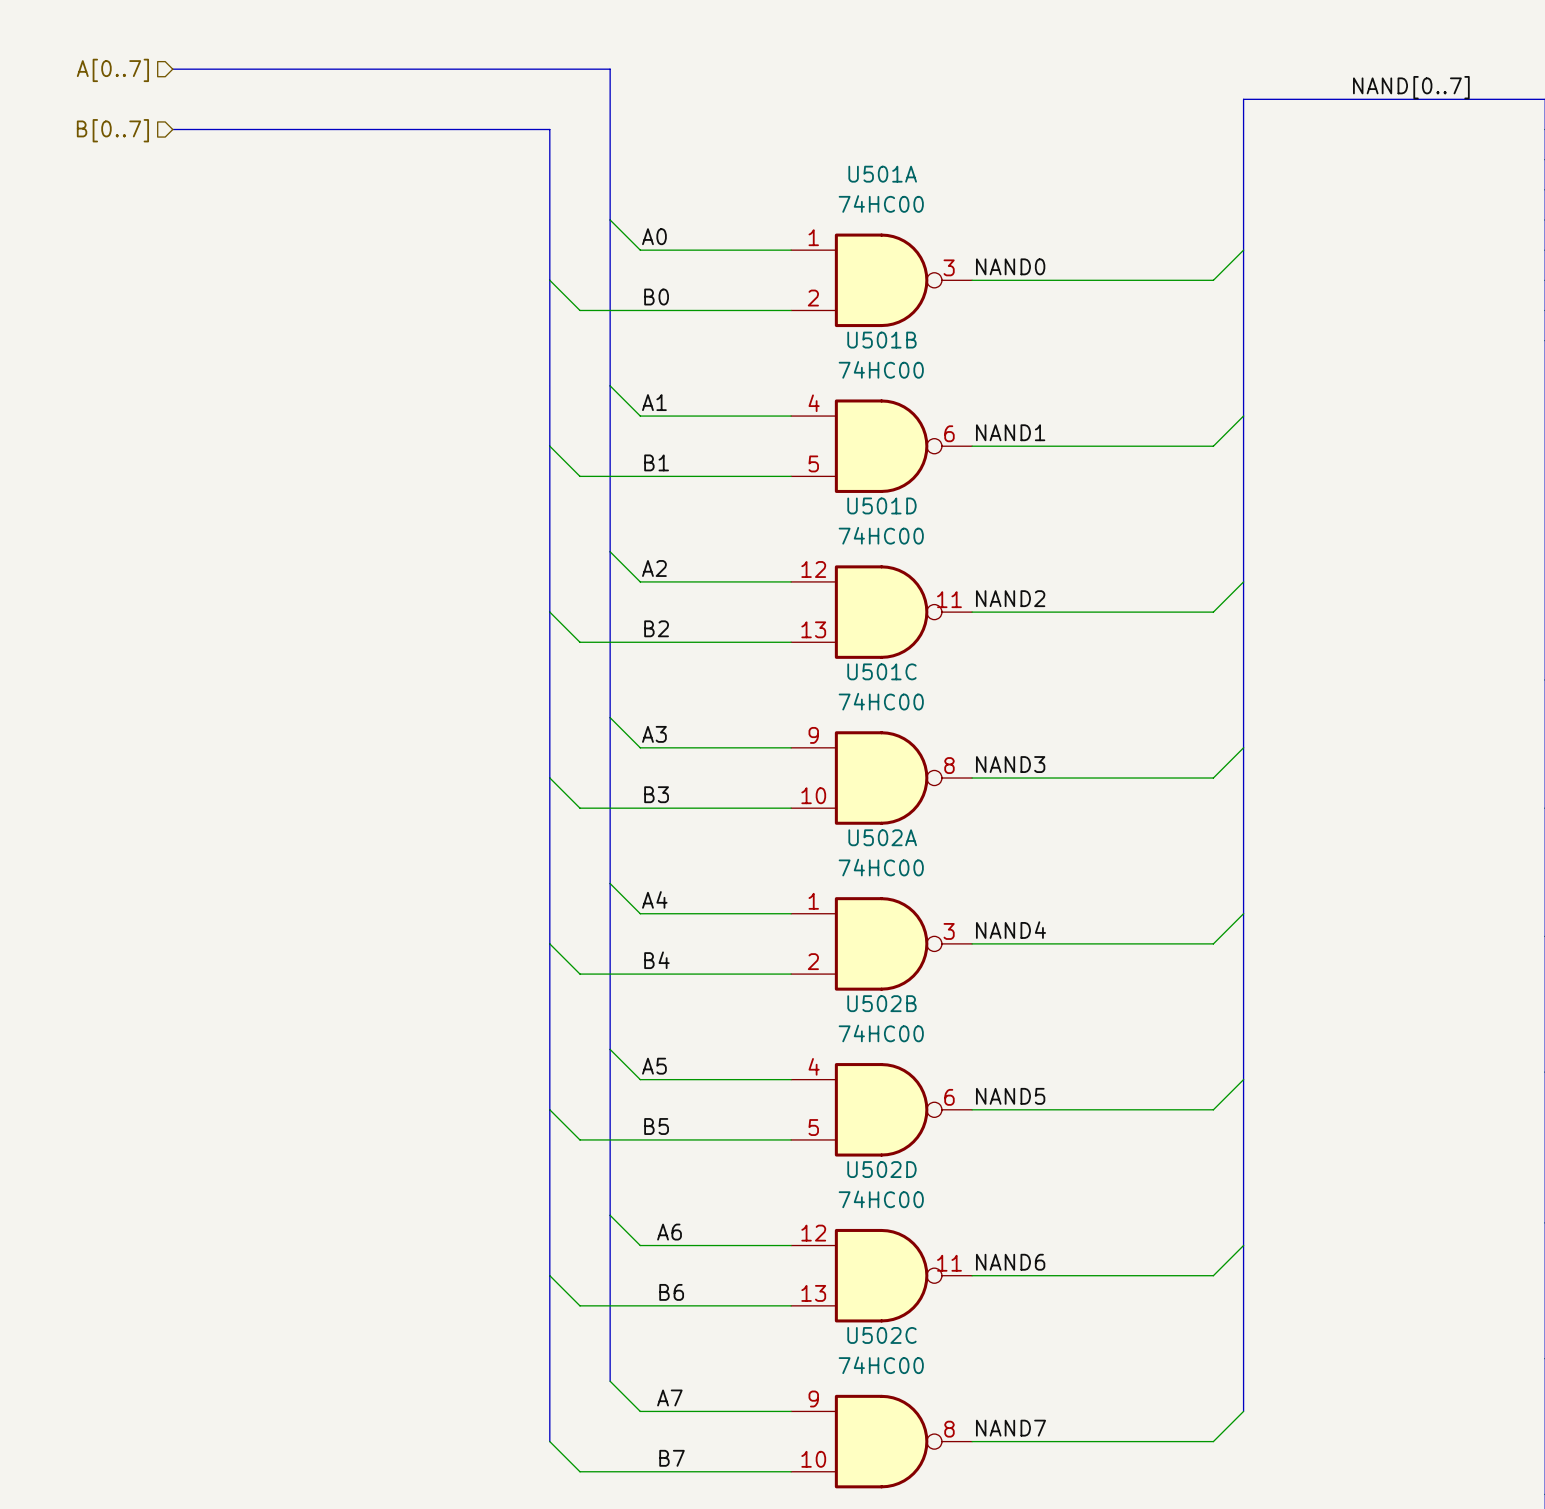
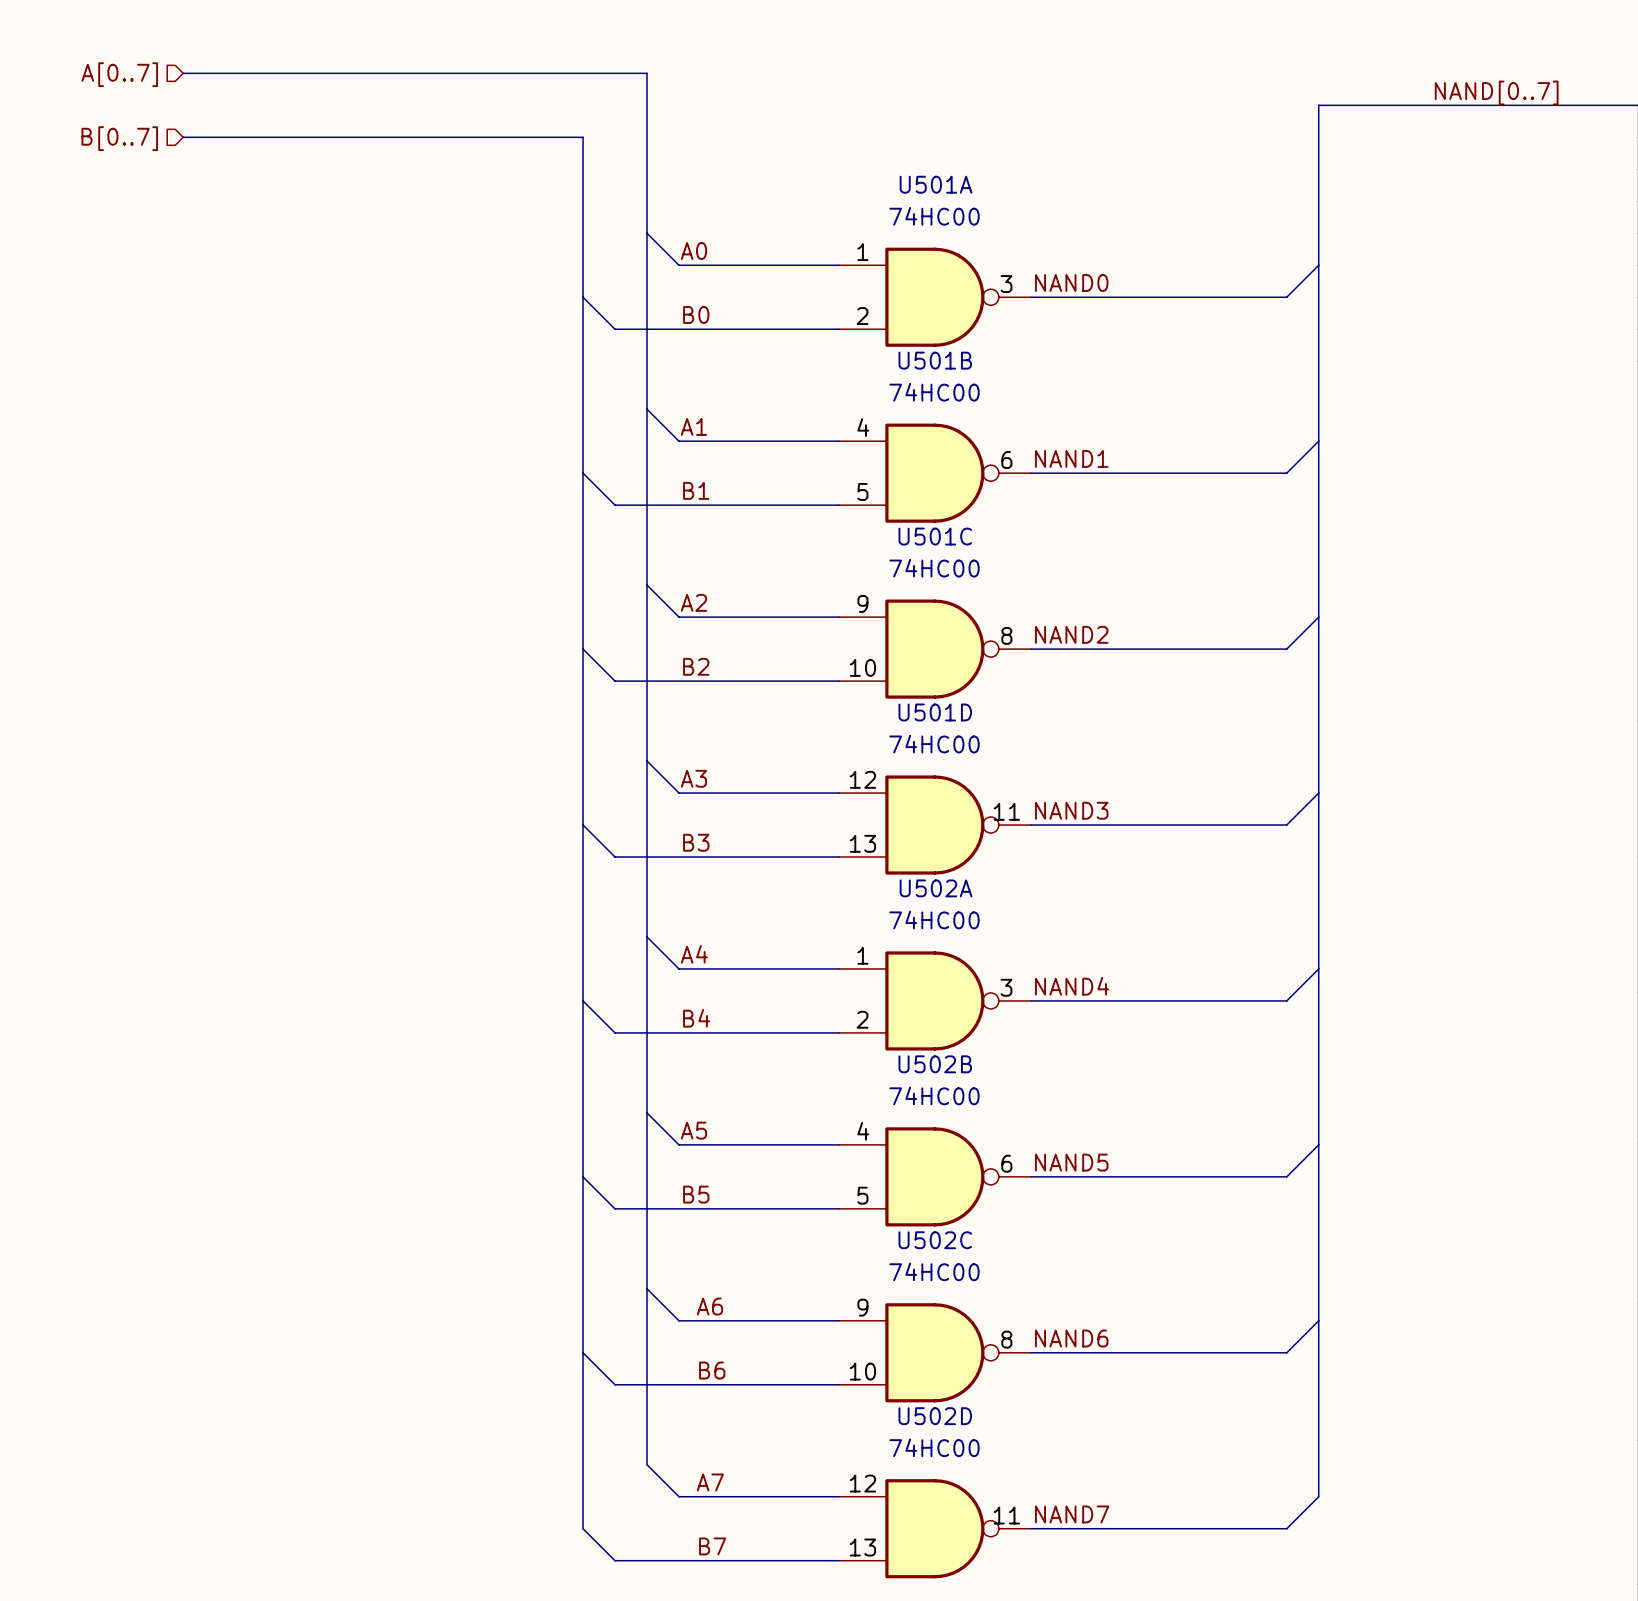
U501D position: (881, 612) -> (934, 825)
U501C position: (881, 778) -> (934, 649)
U502D position: (881, 1275) -> (934, 1528)
U502C position: (881, 1441) -> (934, 1352)

